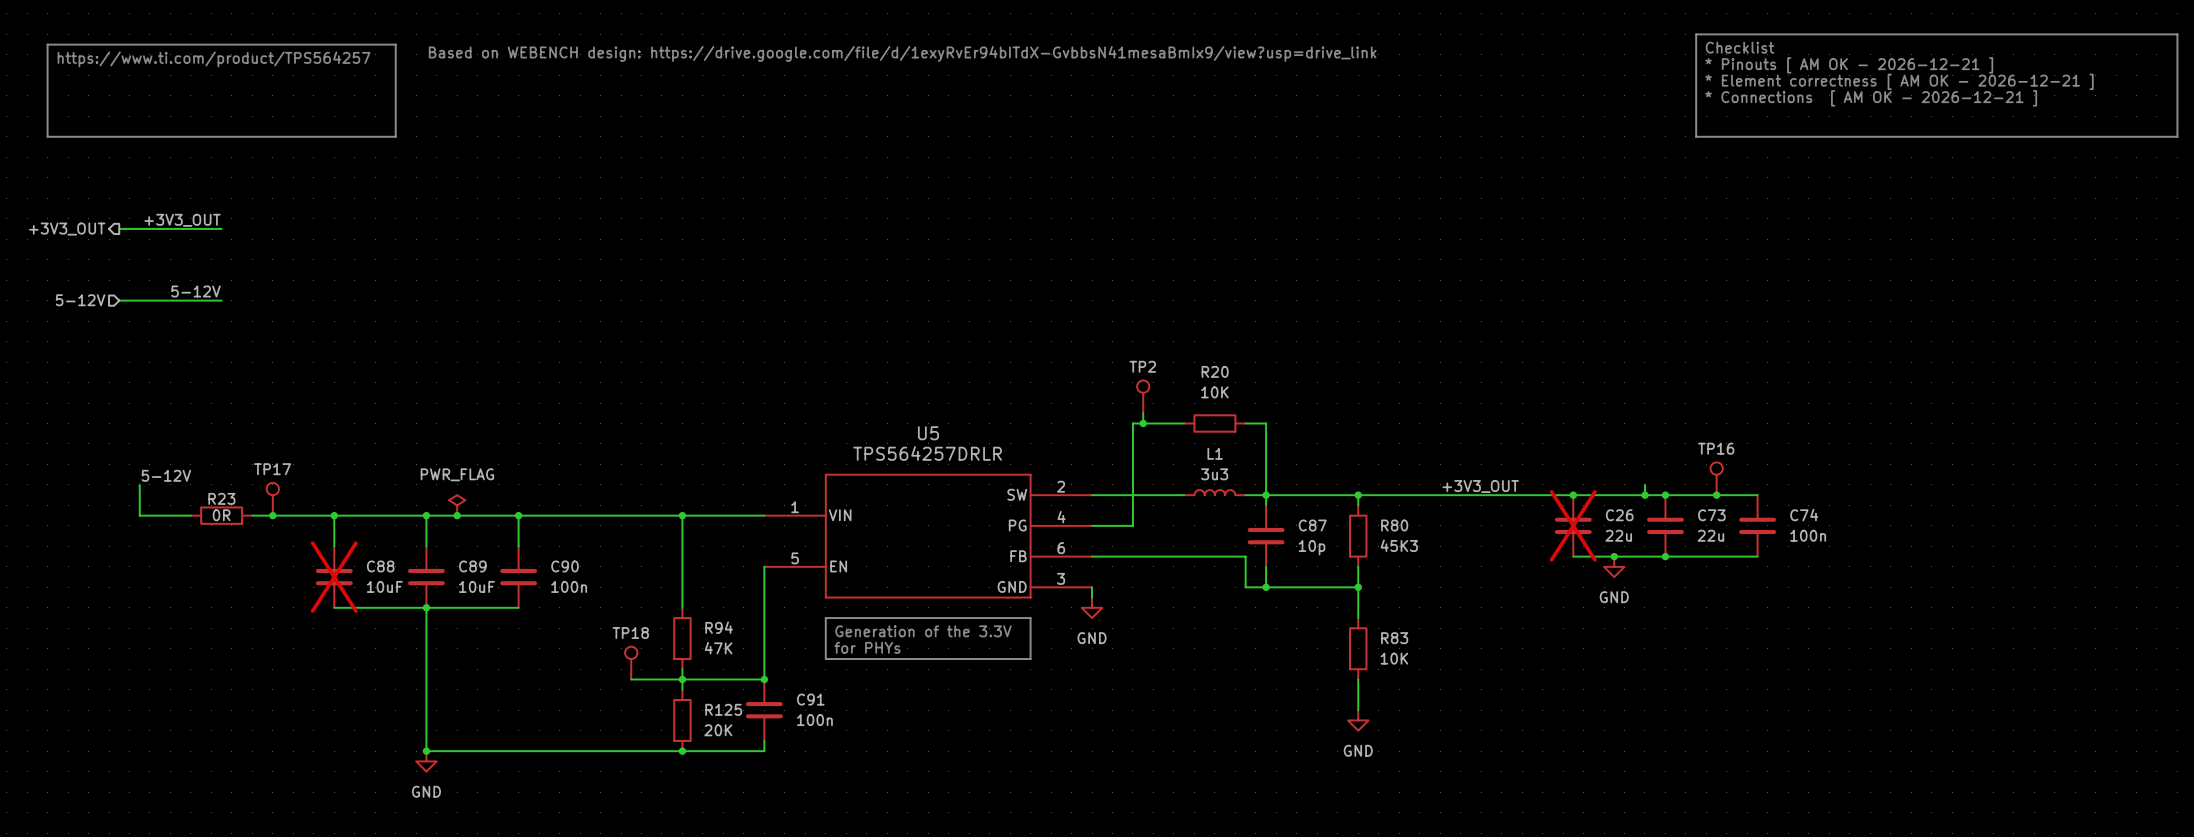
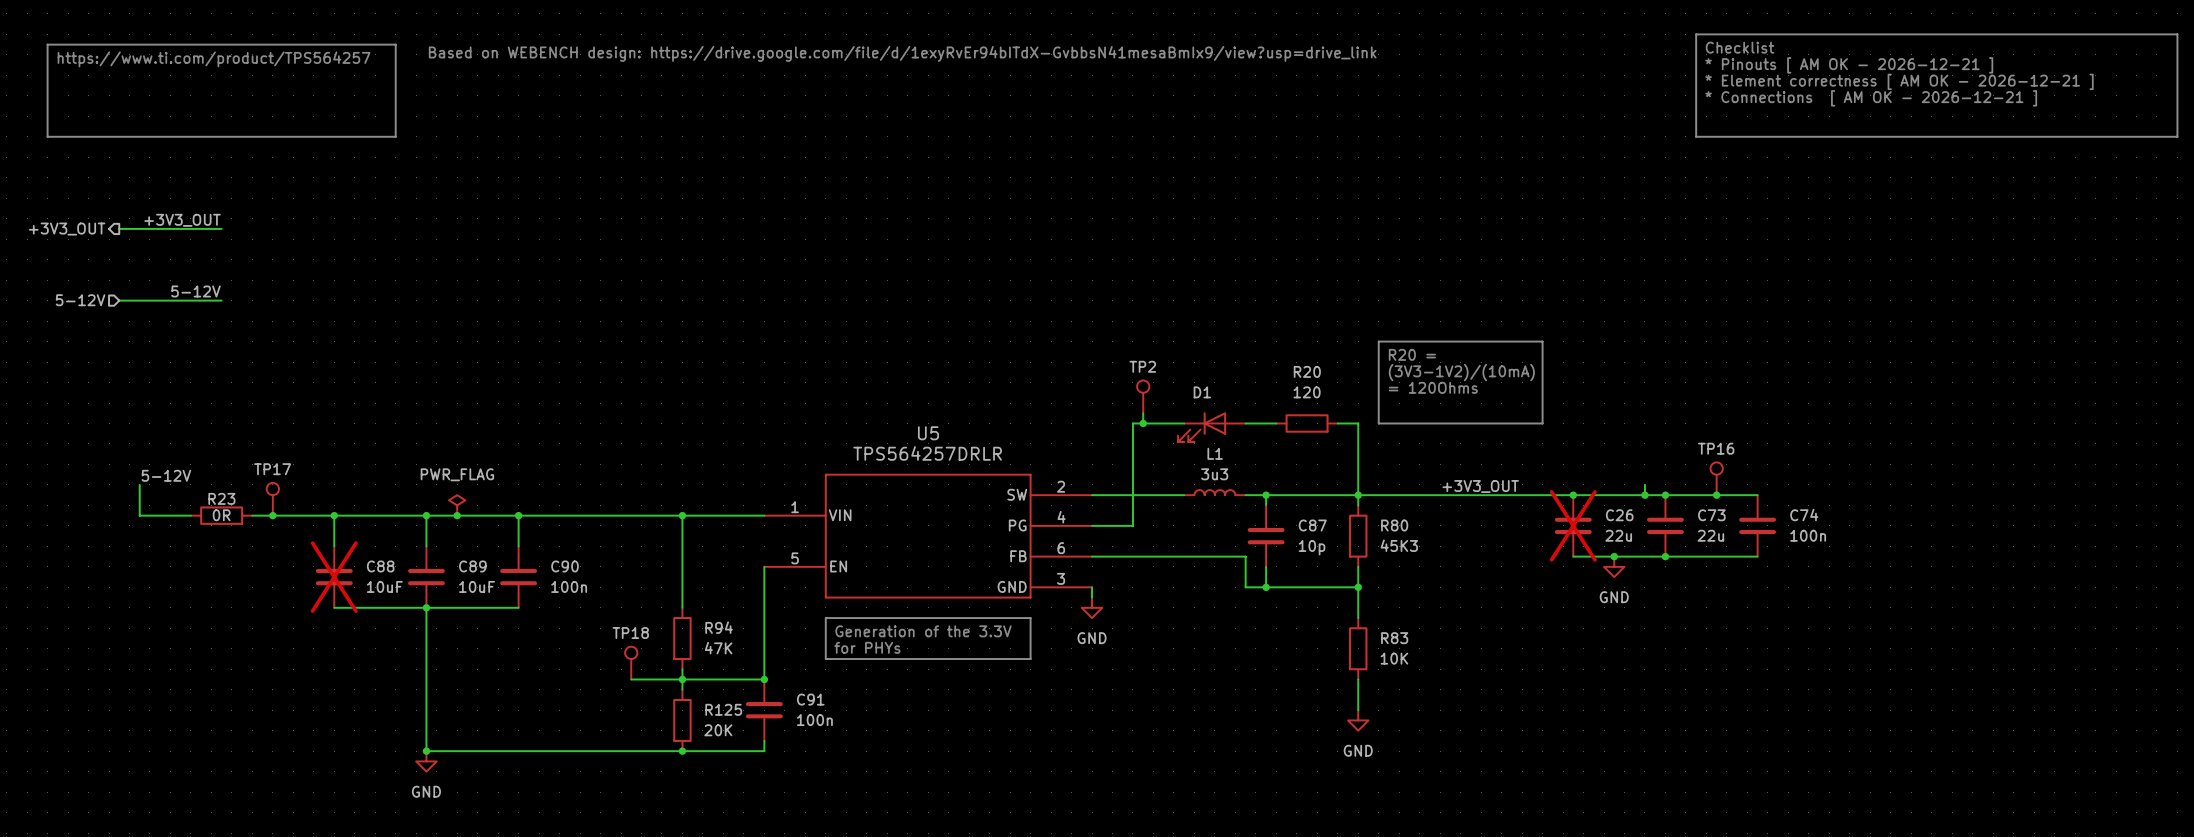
line: none -> (1378, 341) (1542, 341) (1542, 423) (1378, 423) (1378, 341)
text: none -> R20 = (1412, 354)
text: none -> (3V3-1V2)/(10mA) (1461, 372)
text: none -> = 120Ohms (1433, 387)
R20 value: 10K (1214, 392) -> 120 (1307, 392)
R20 position: (1214, 423) -> (1307, 423)
wire: (1266, 423) (1266, 495) -> (1266, 423) (1276, 423)
wire: none -> (1337, 423) (1358, 423) (1358, 495)
D1: none -> (1211, 427)

